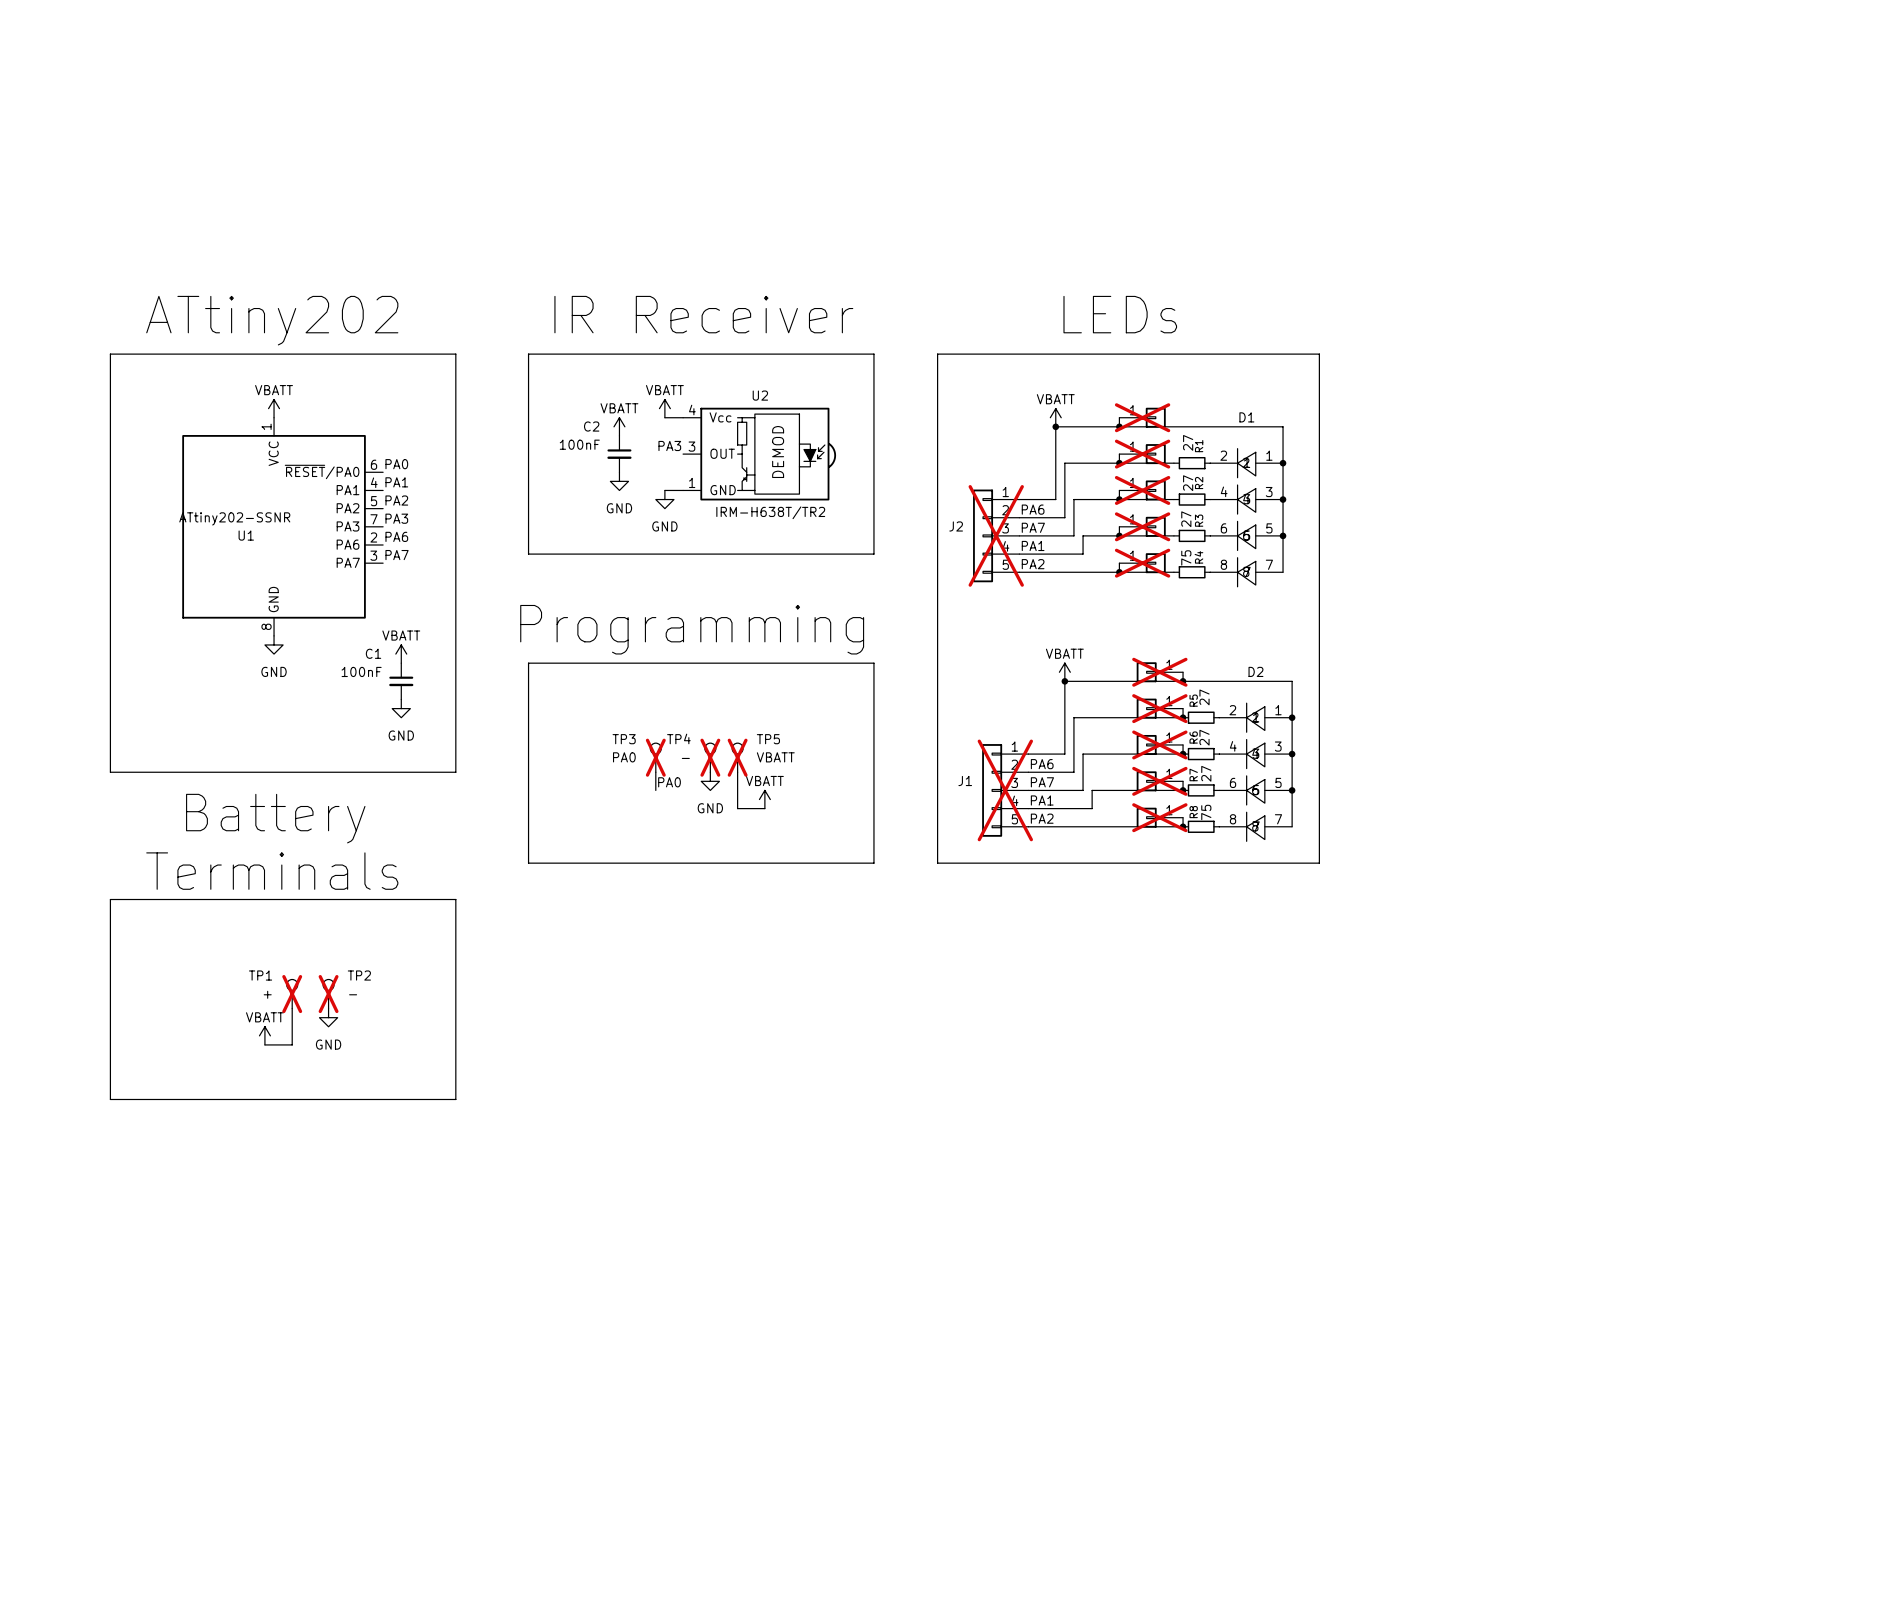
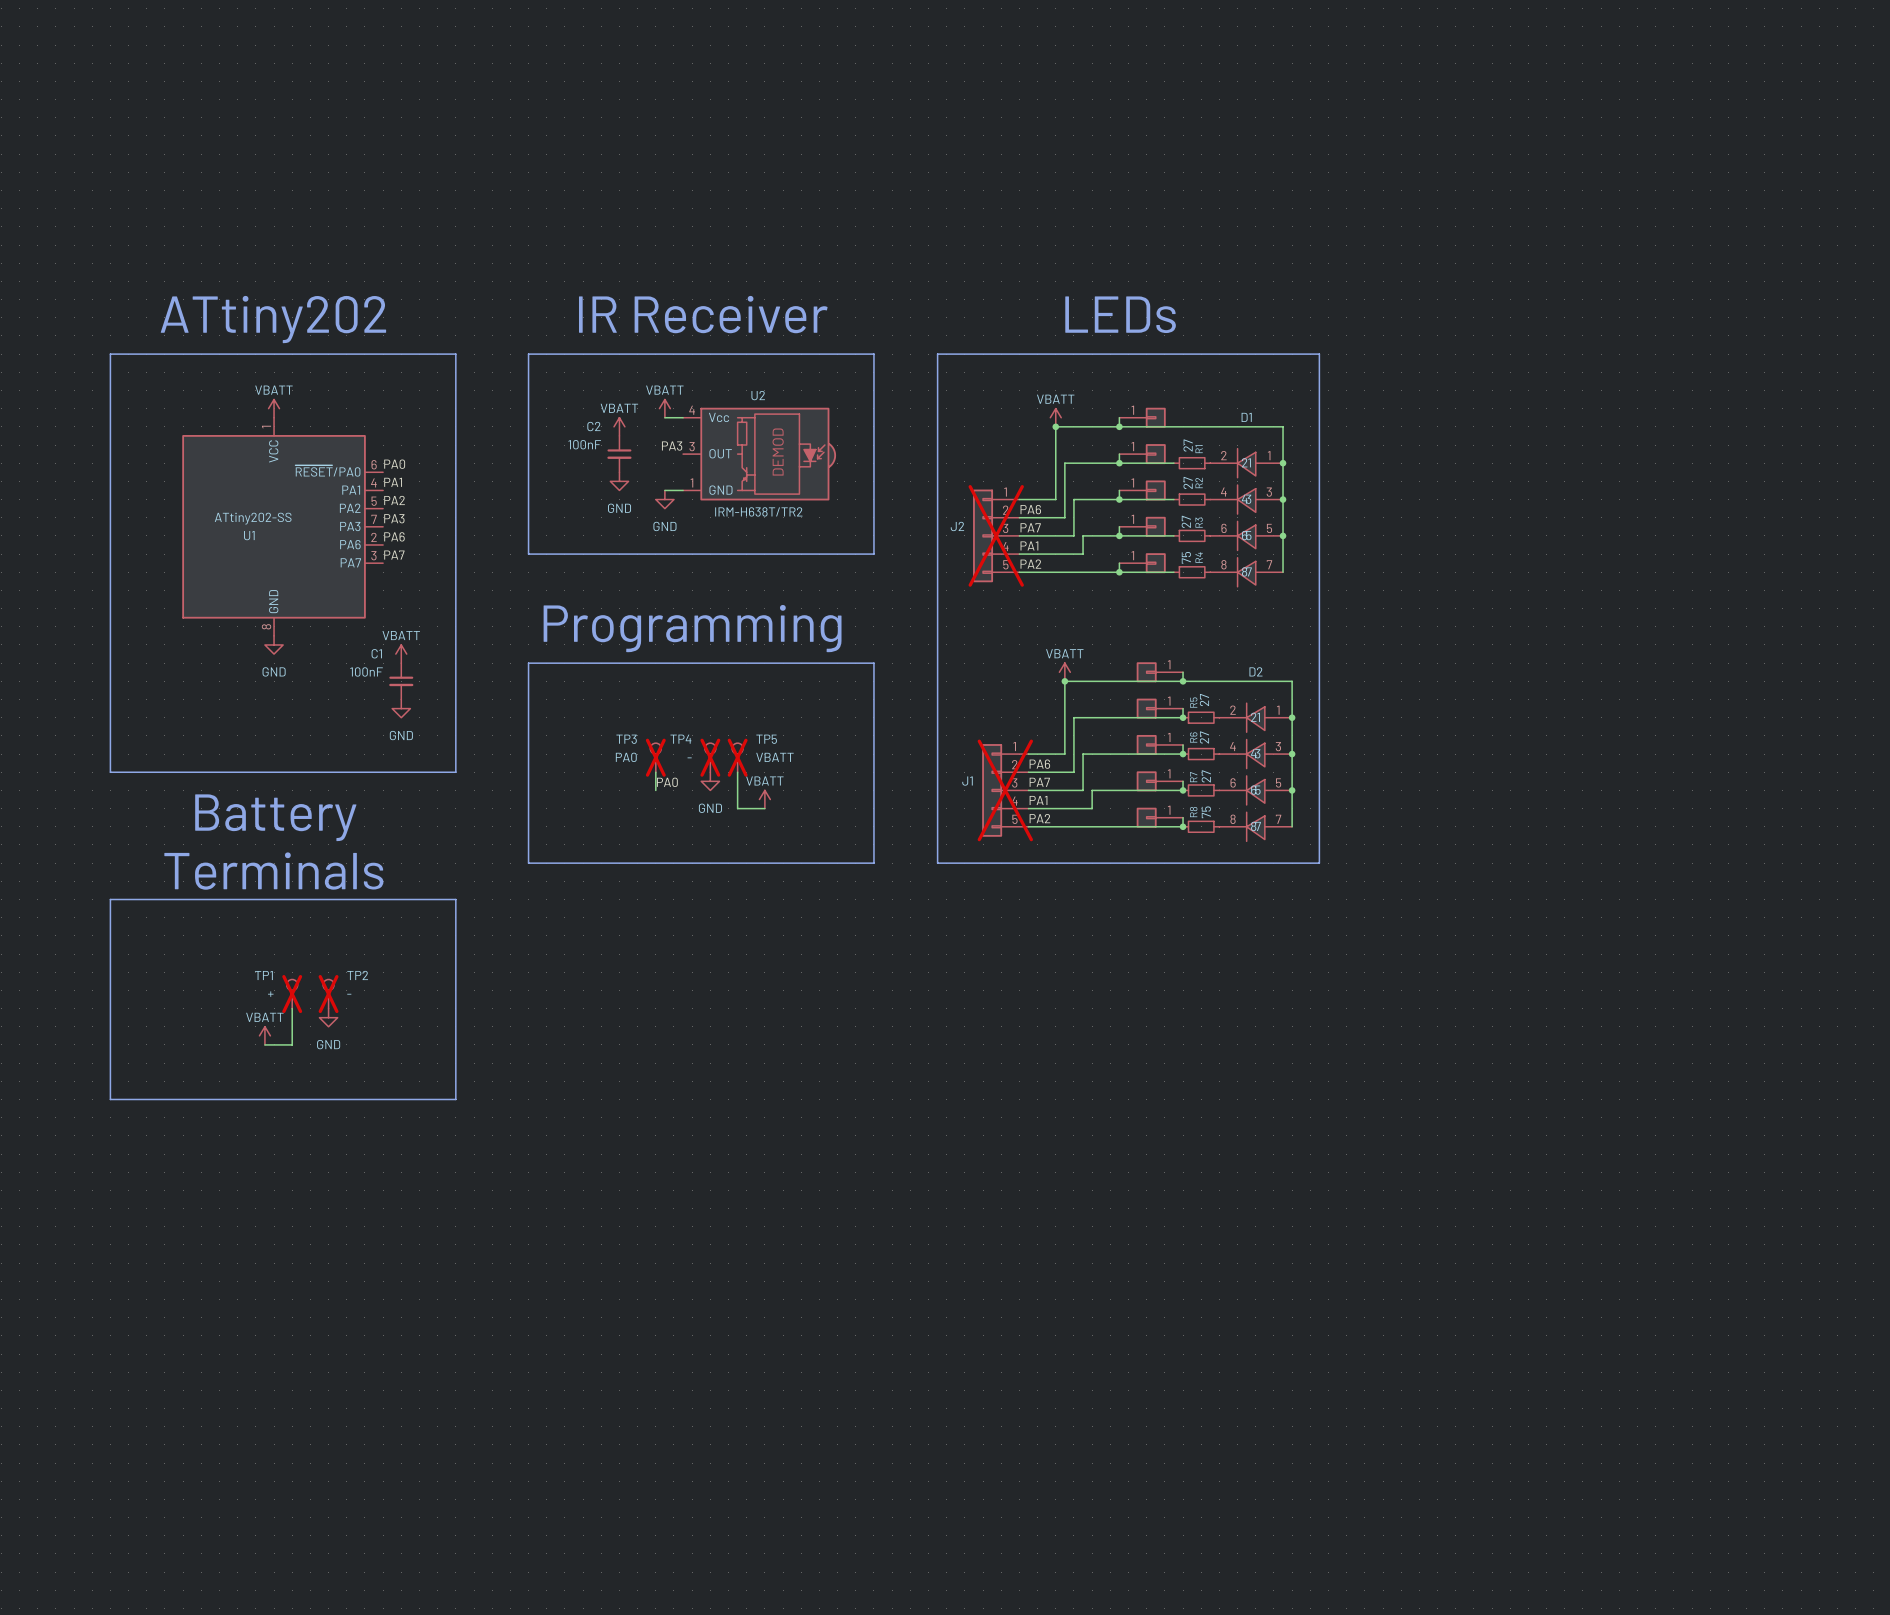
part do-not-place cross: (1142, 417) -> none
part do-not-place cross: (1142, 454) -> none
part do-not-place cross: (1142, 490) -> none
U1 value: ATtiny202-SSNR (234, 518) -> ATtiny202-SS (253, 518)
part do-not-place cross: (1142, 526) -> none
part do-not-place cross: (1142, 563) -> none
part do-not-place cross: (1159, 672) -> none
part do-not-place cross: (1159, 708) -> none
part do-not-place cross: (1159, 744) -> none
part do-not-place cross: (1159, 781) -> none
part do-not-place cross: (1159, 817) -> none

